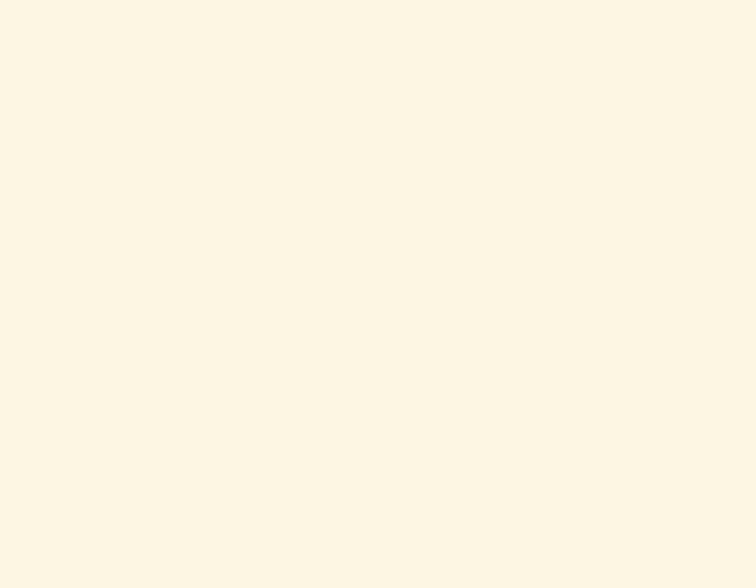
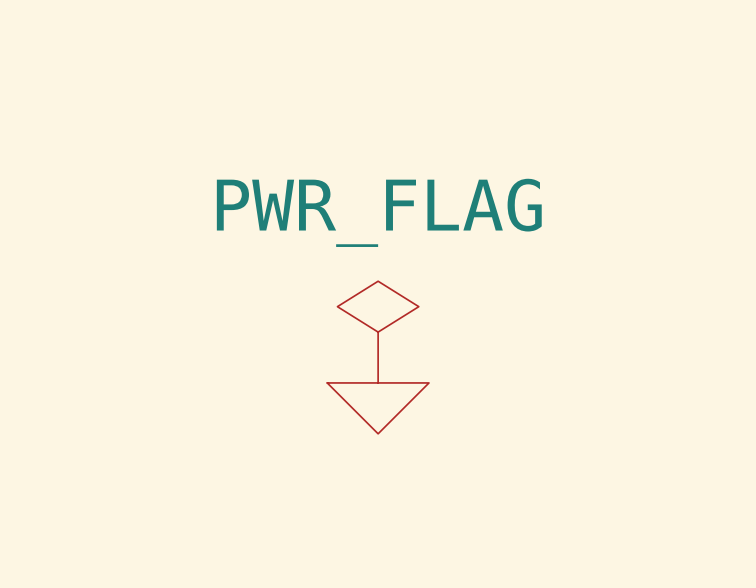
power symbol: none -> PWR_FLAG (378, 332)
power symbol: none -> (378, 408)

